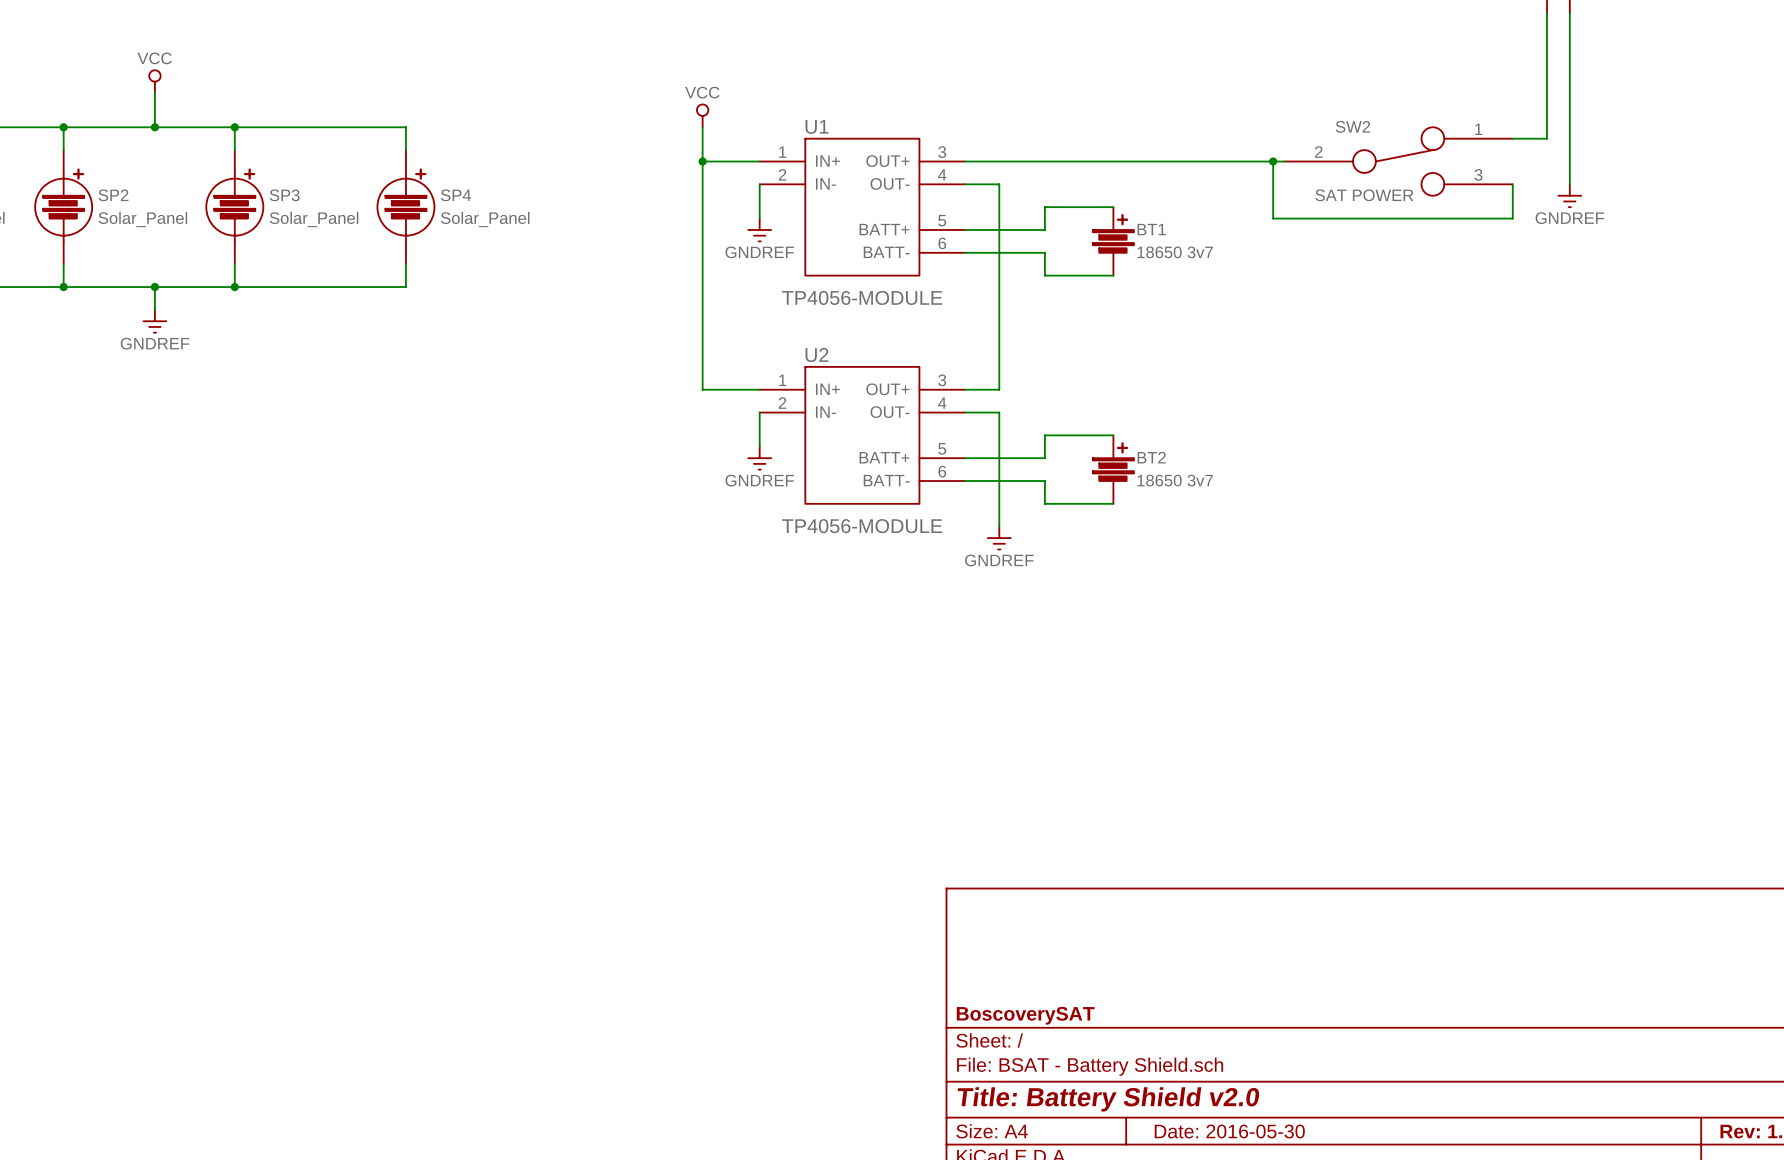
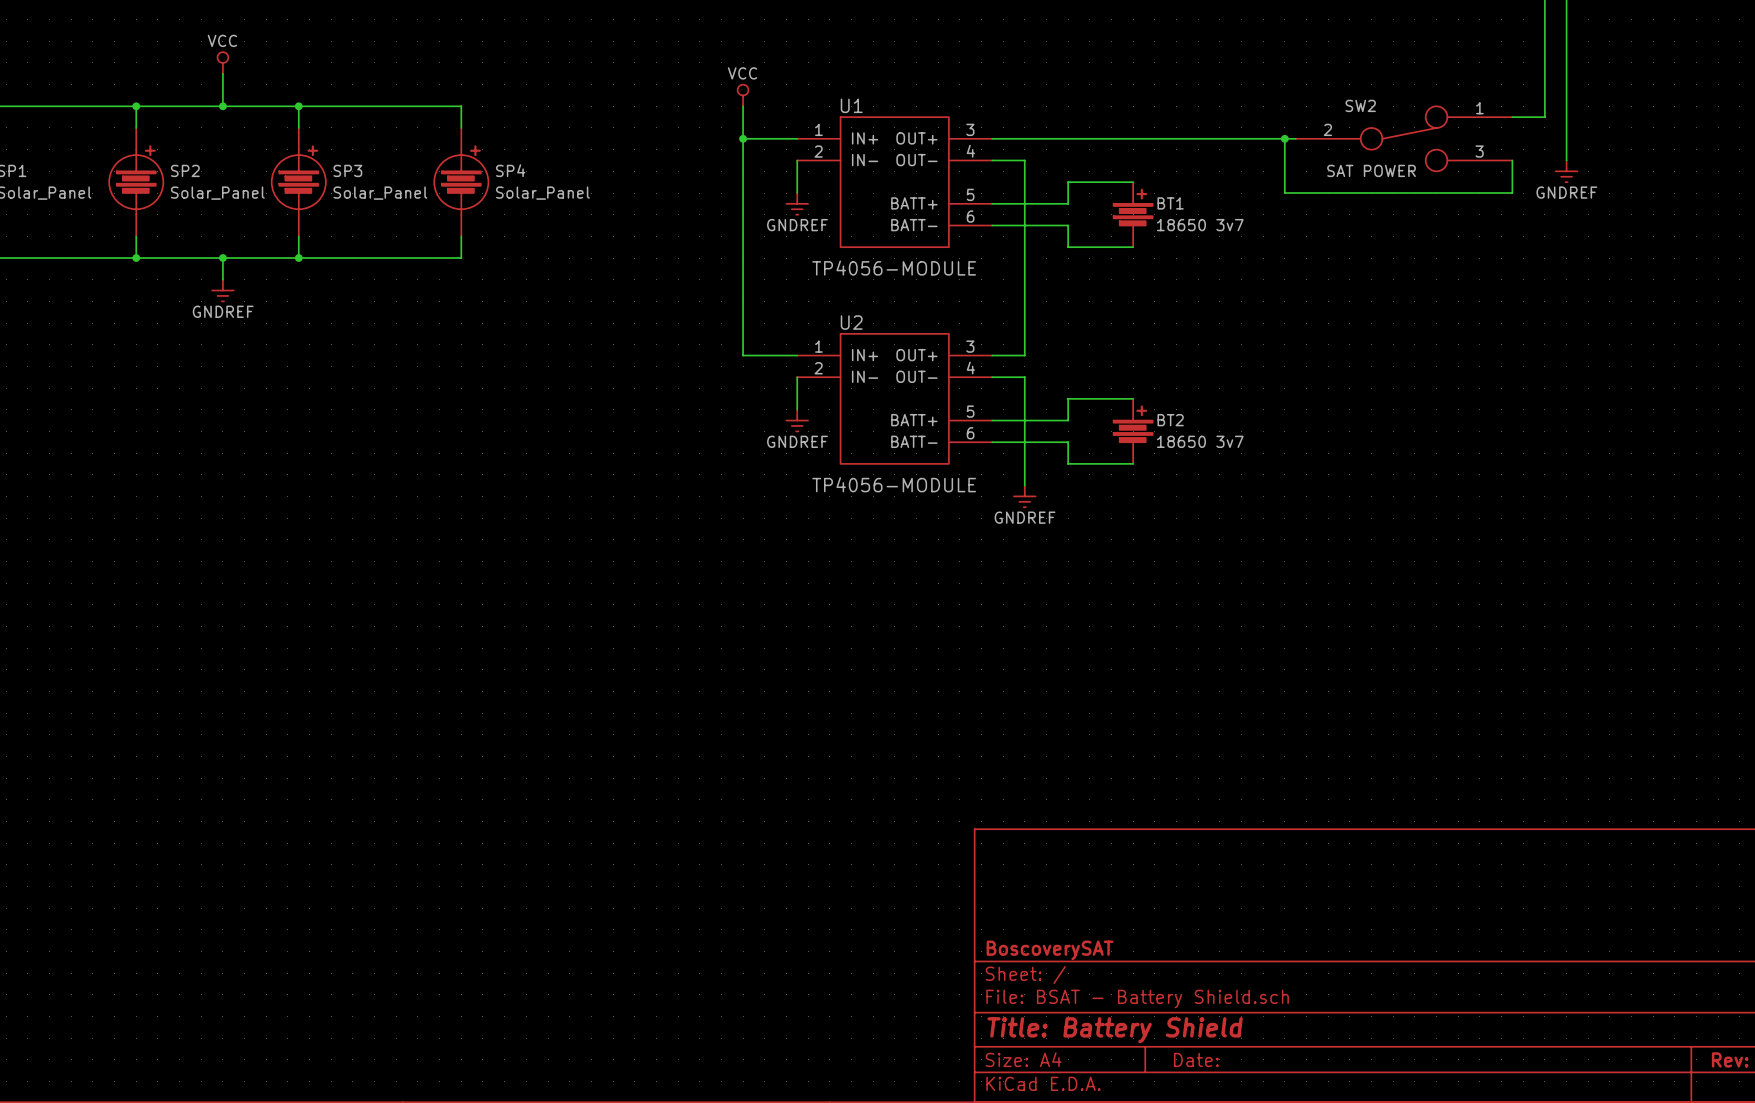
title block: Title: Battery Shield v2.0 (1108, 1099) -> Title: Battery Shield (1115, 1030)
title block: Date: 2016-05-30 (1229, 1131) -> Date: (1196, 1059)

